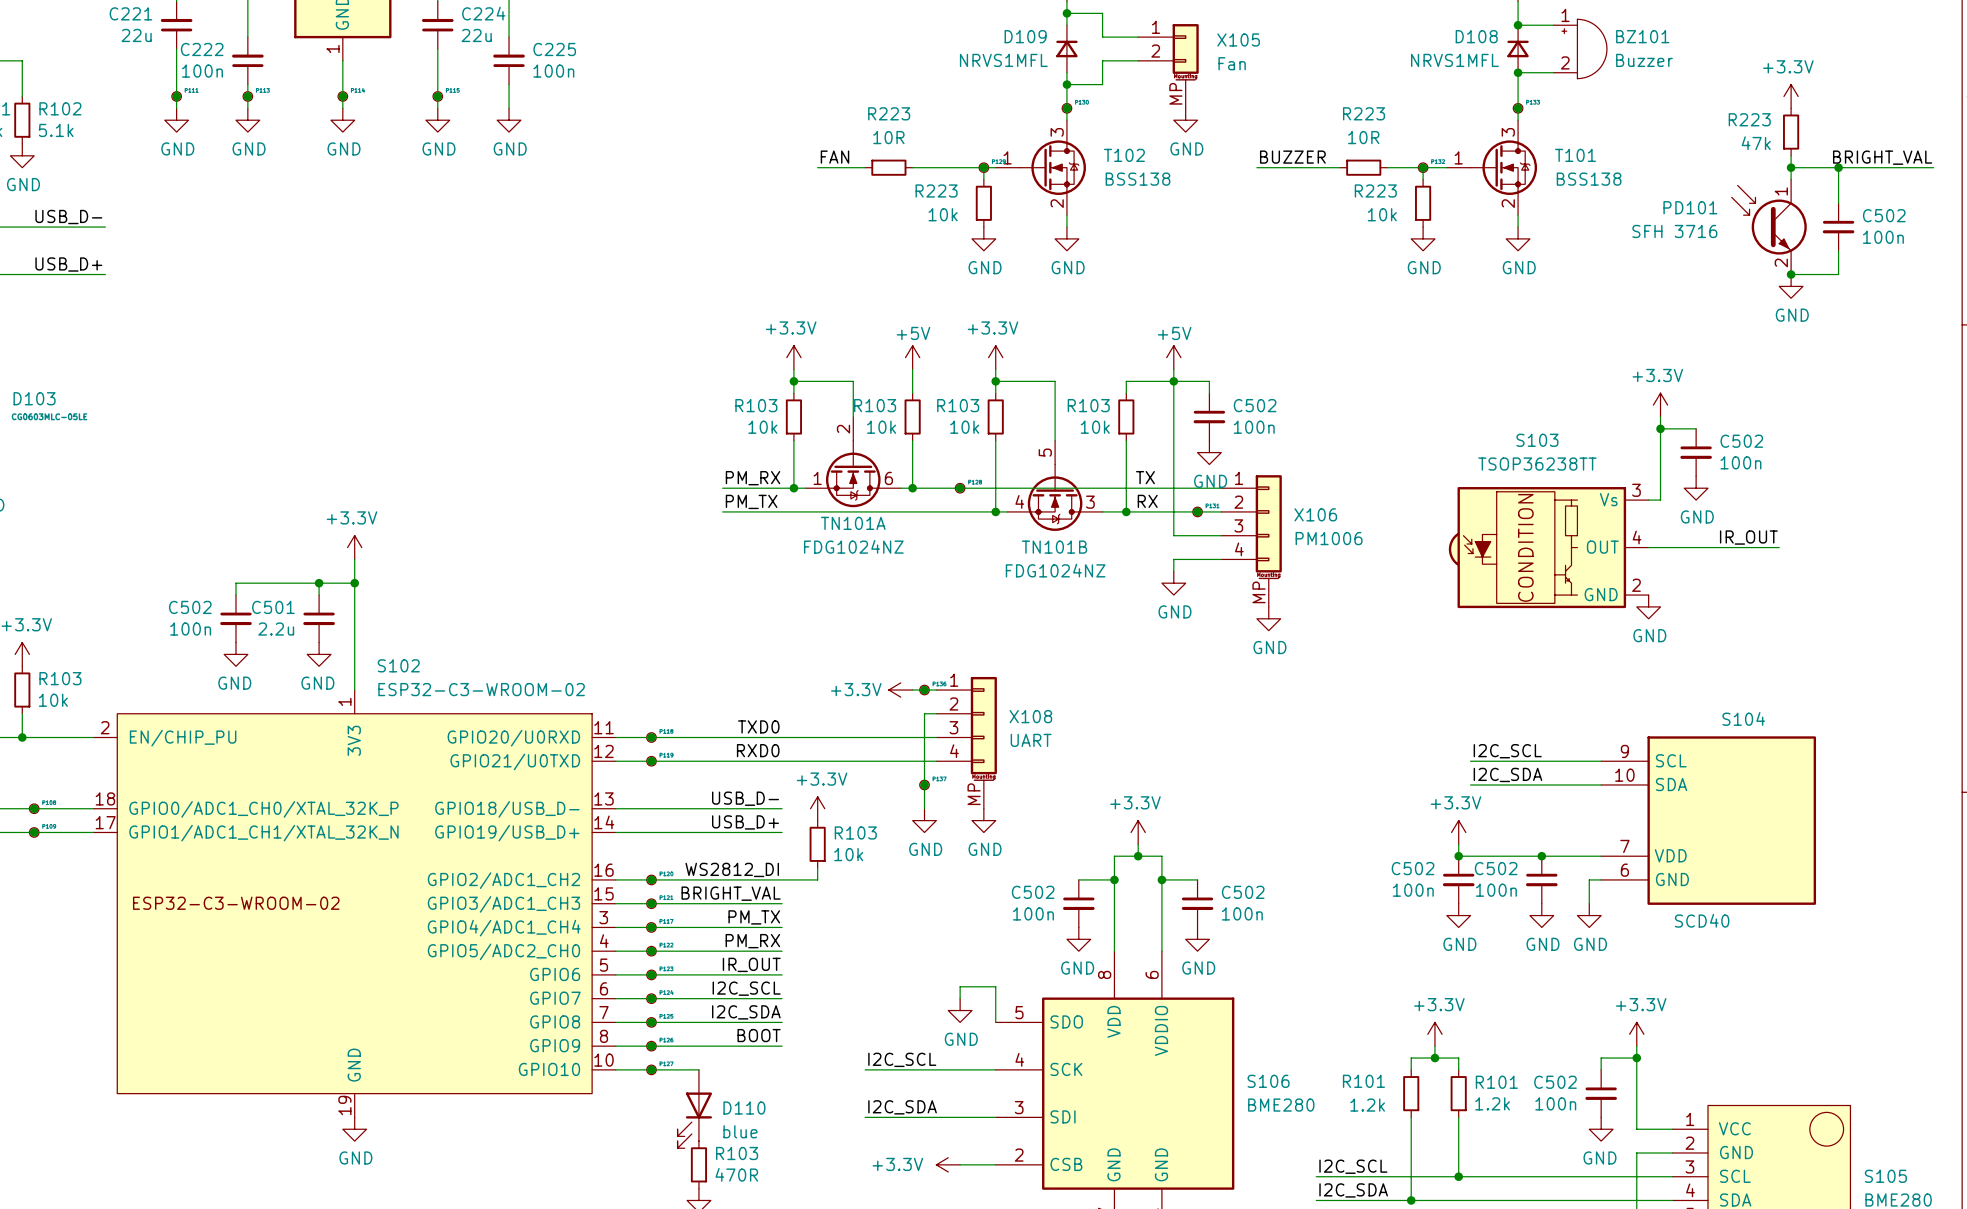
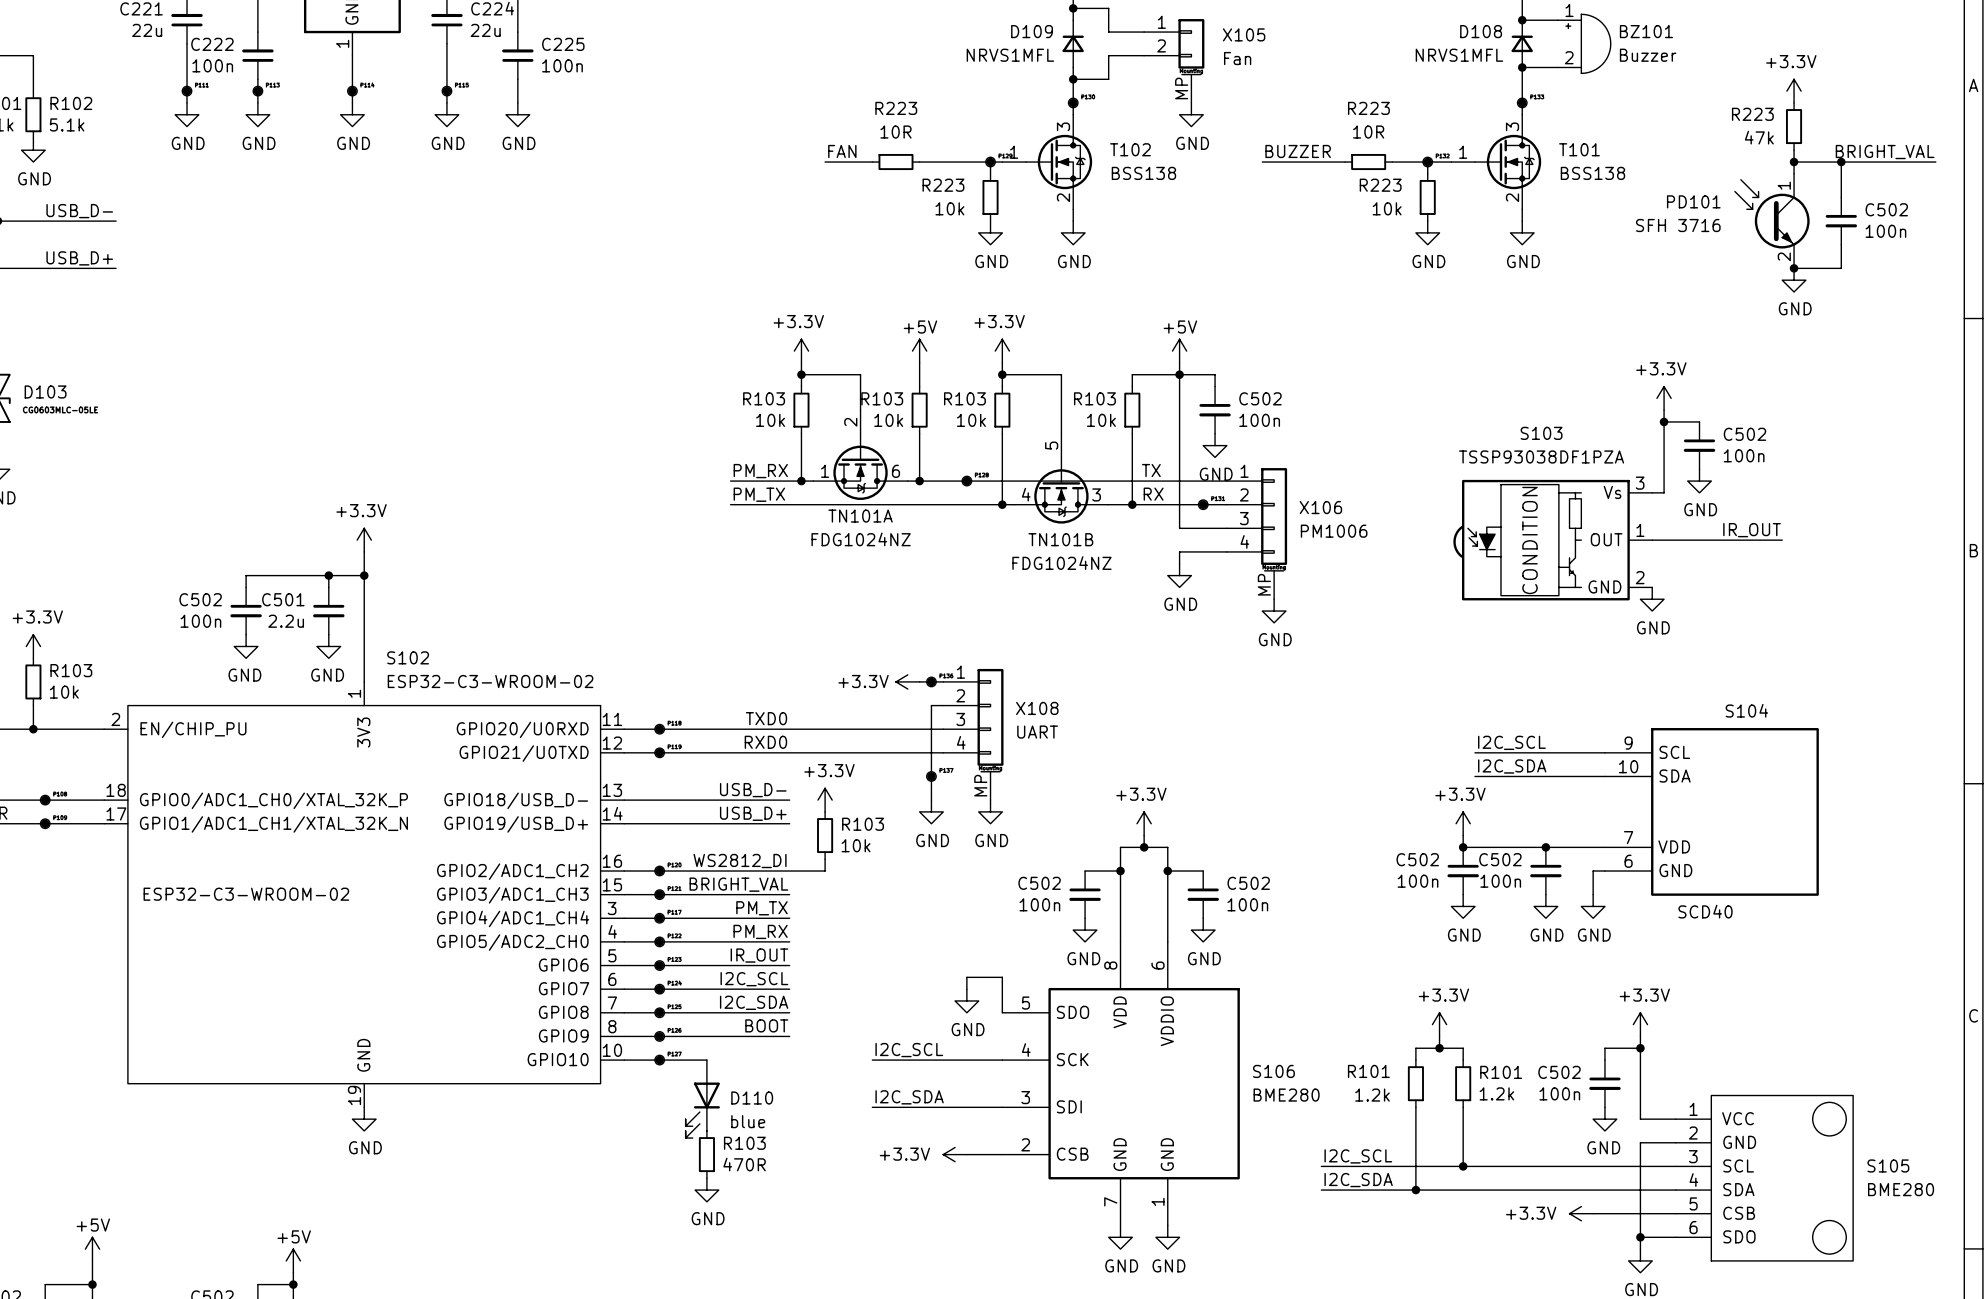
S103 value: TSOP36238TT (1537, 464) -> TSSP93038DF1PZA (1541, 456)
S103 pin number: 4 (1637, 537) -> 1 (1640, 530)

